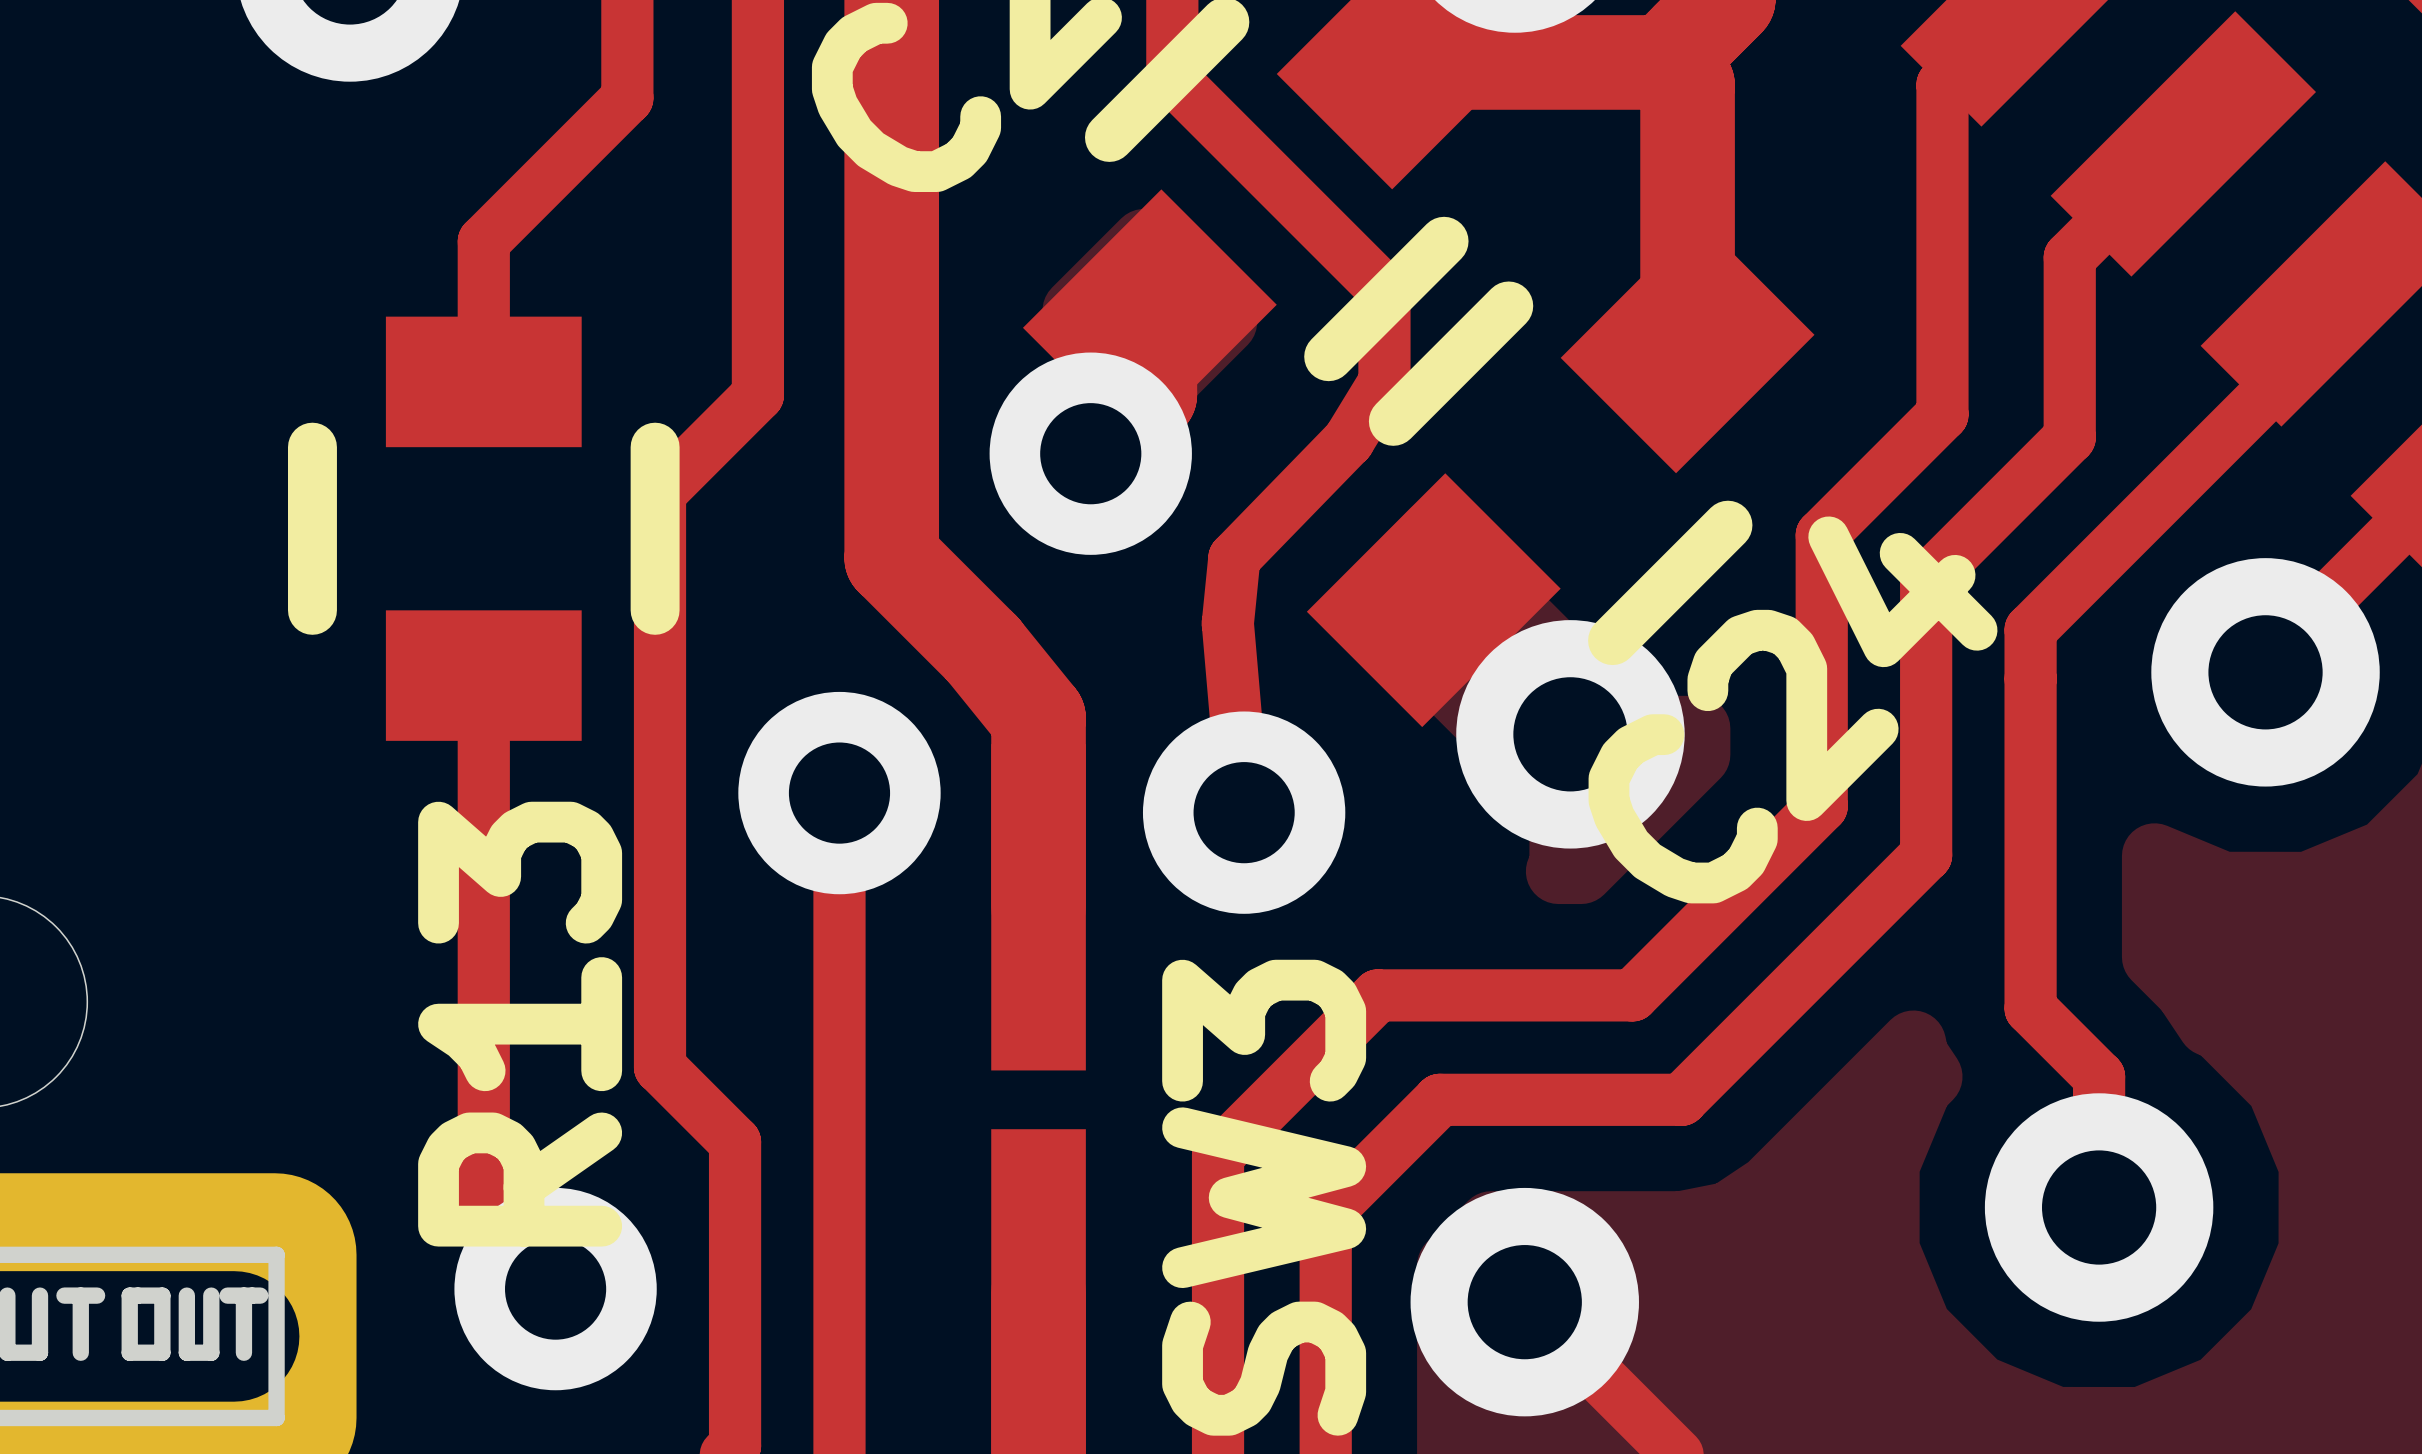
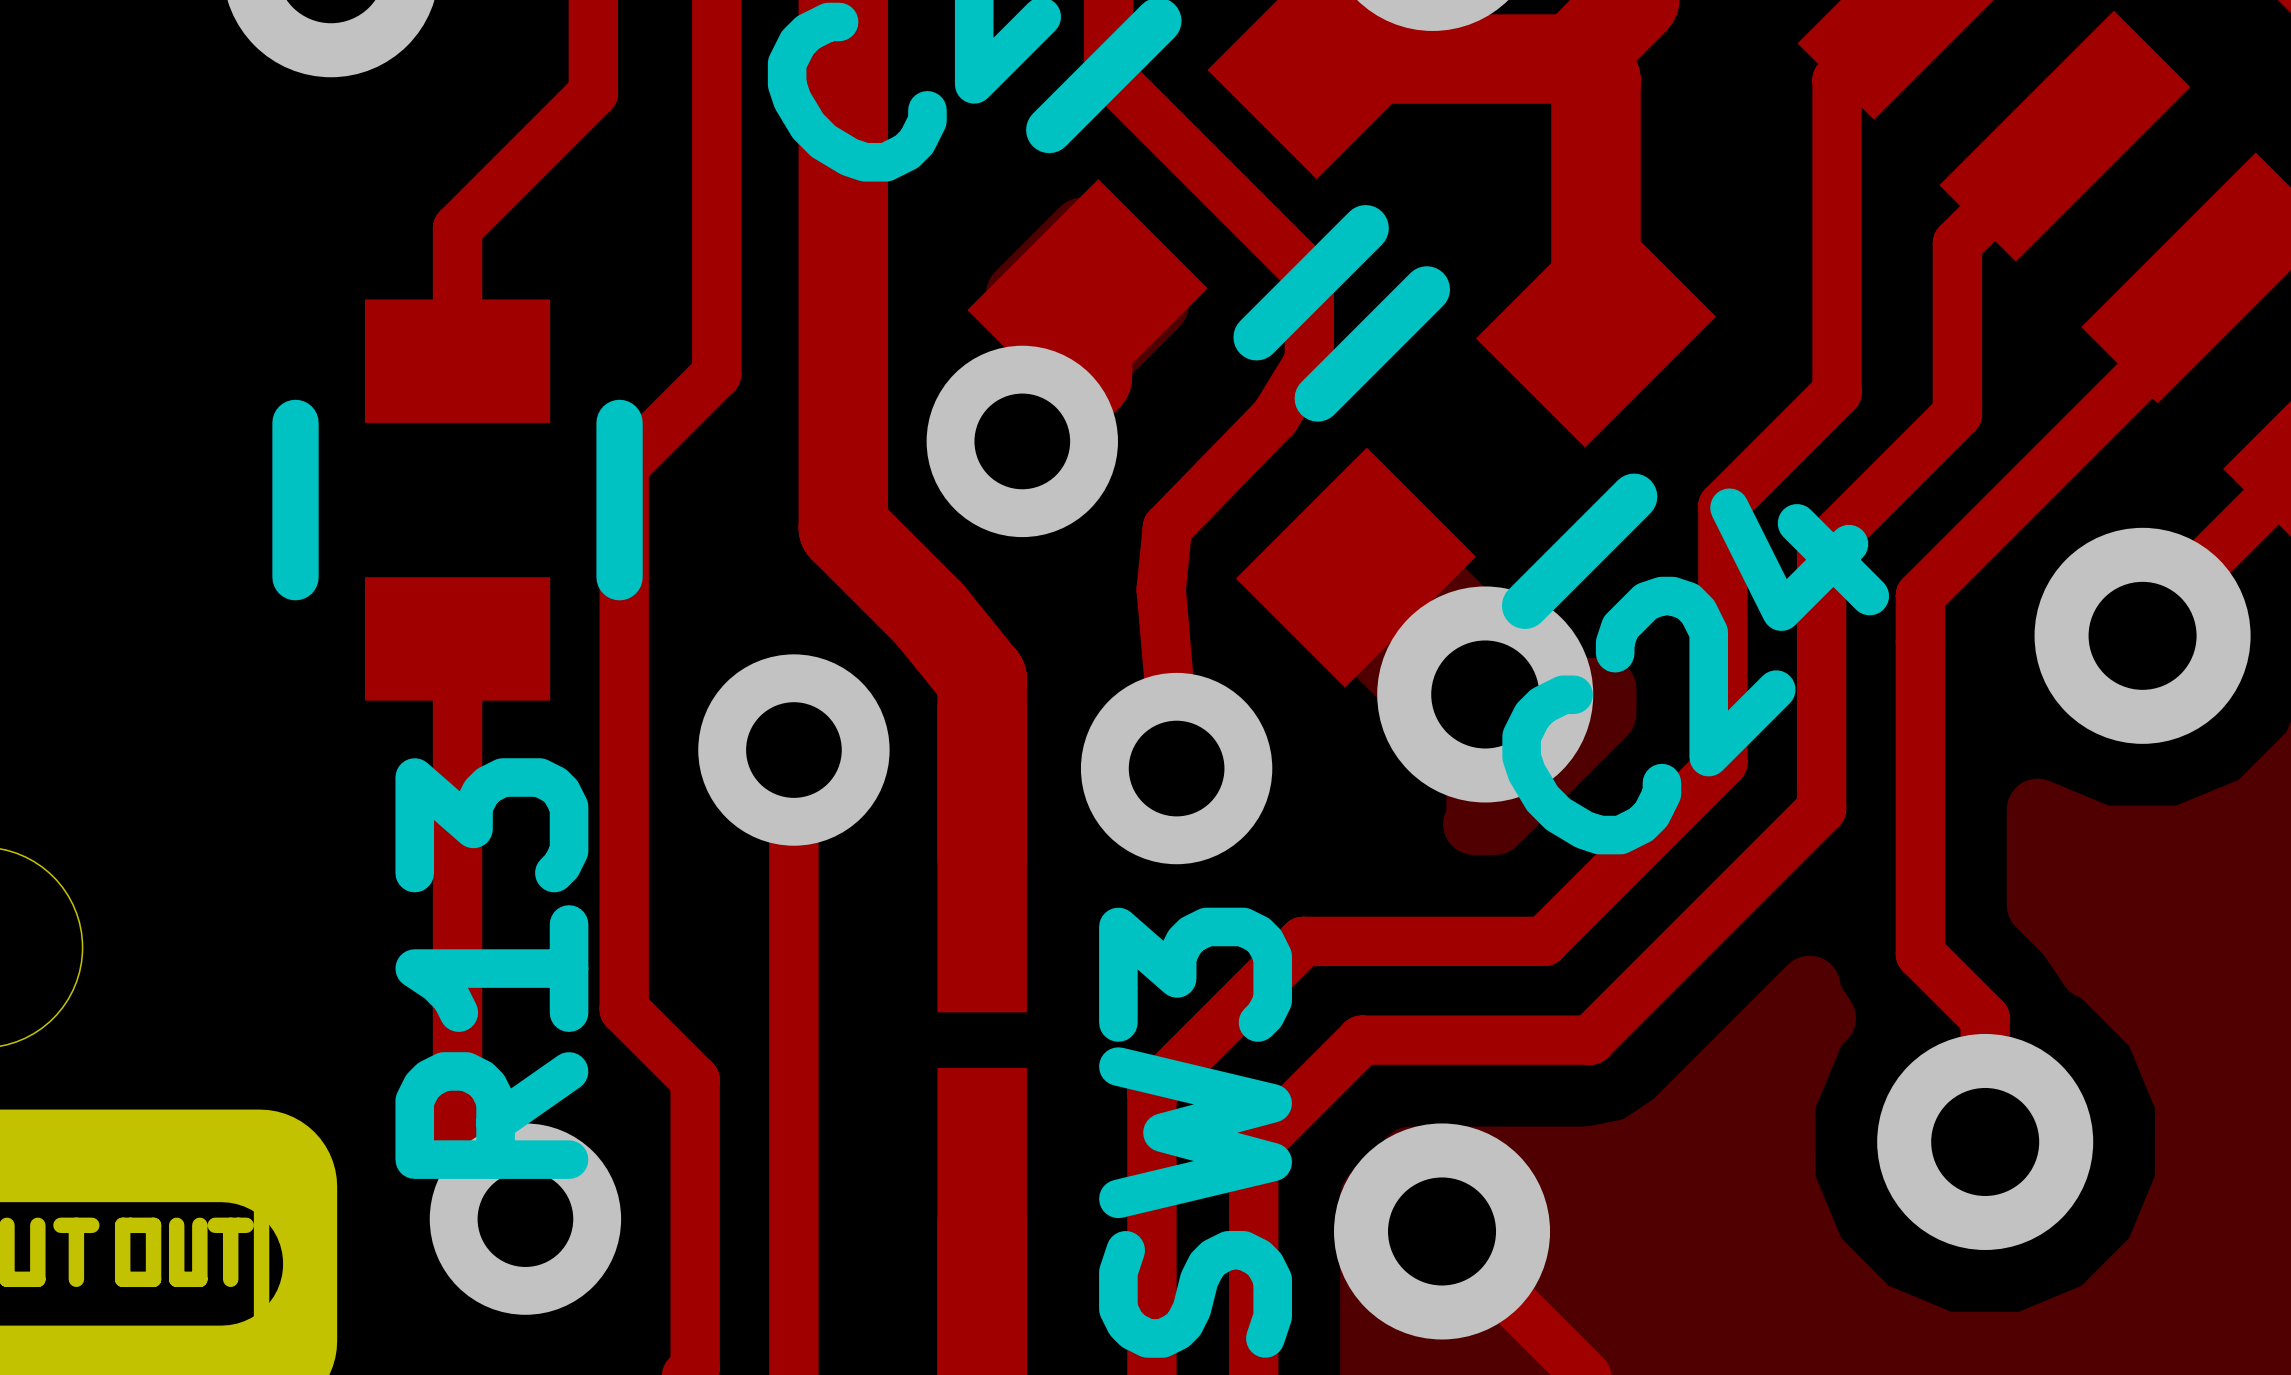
via position: (1090, 453) -> (1022, 441)

